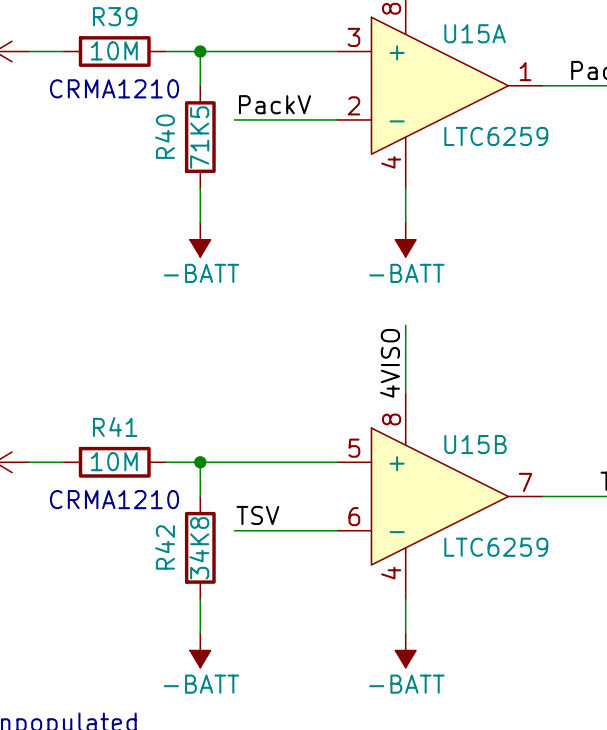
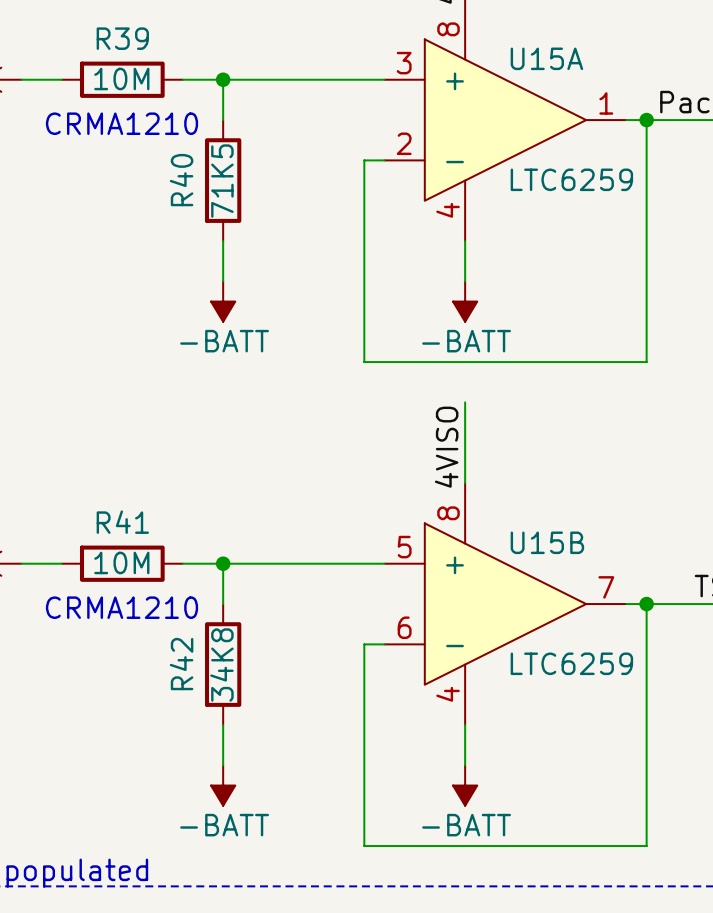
junction: none -> (646, 120)
label: PackV (275, 104) -> none
wire: (234, 119) (320, 119) -> (646, 120) (646, 362) (364, 362) (364, 160)
junction: none -> (646, 604)
label: TSV (257, 515) -> none
wire: (234, 530) (320, 530) -> (646, 604) (646, 846) (364, 846) (364, 644)

